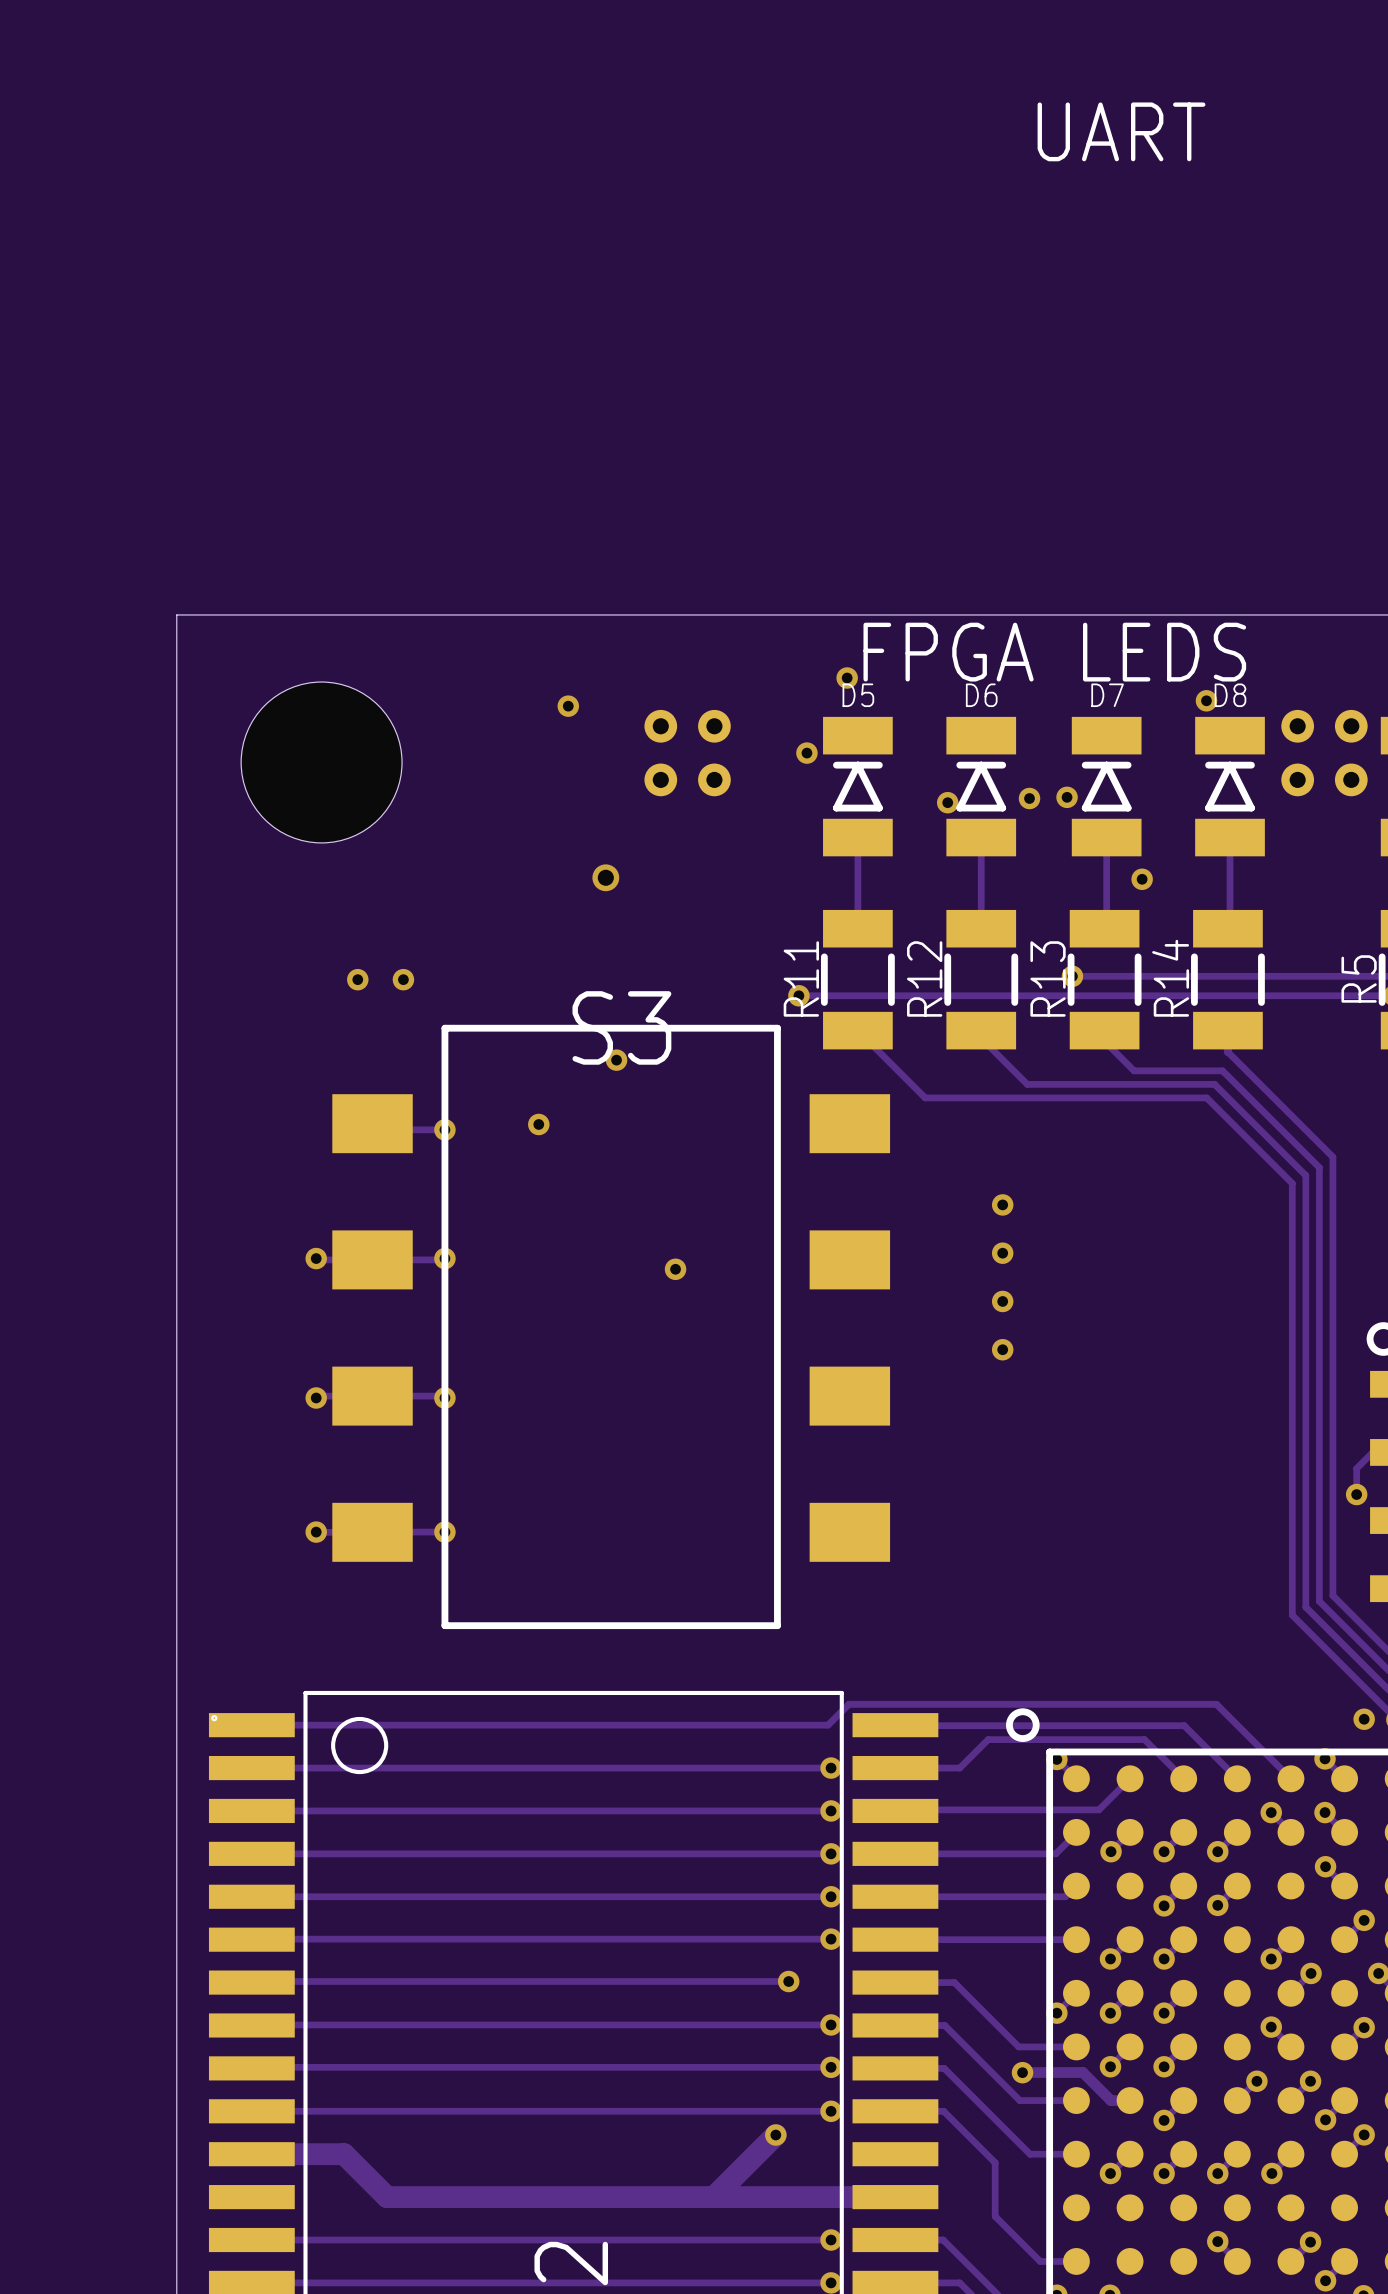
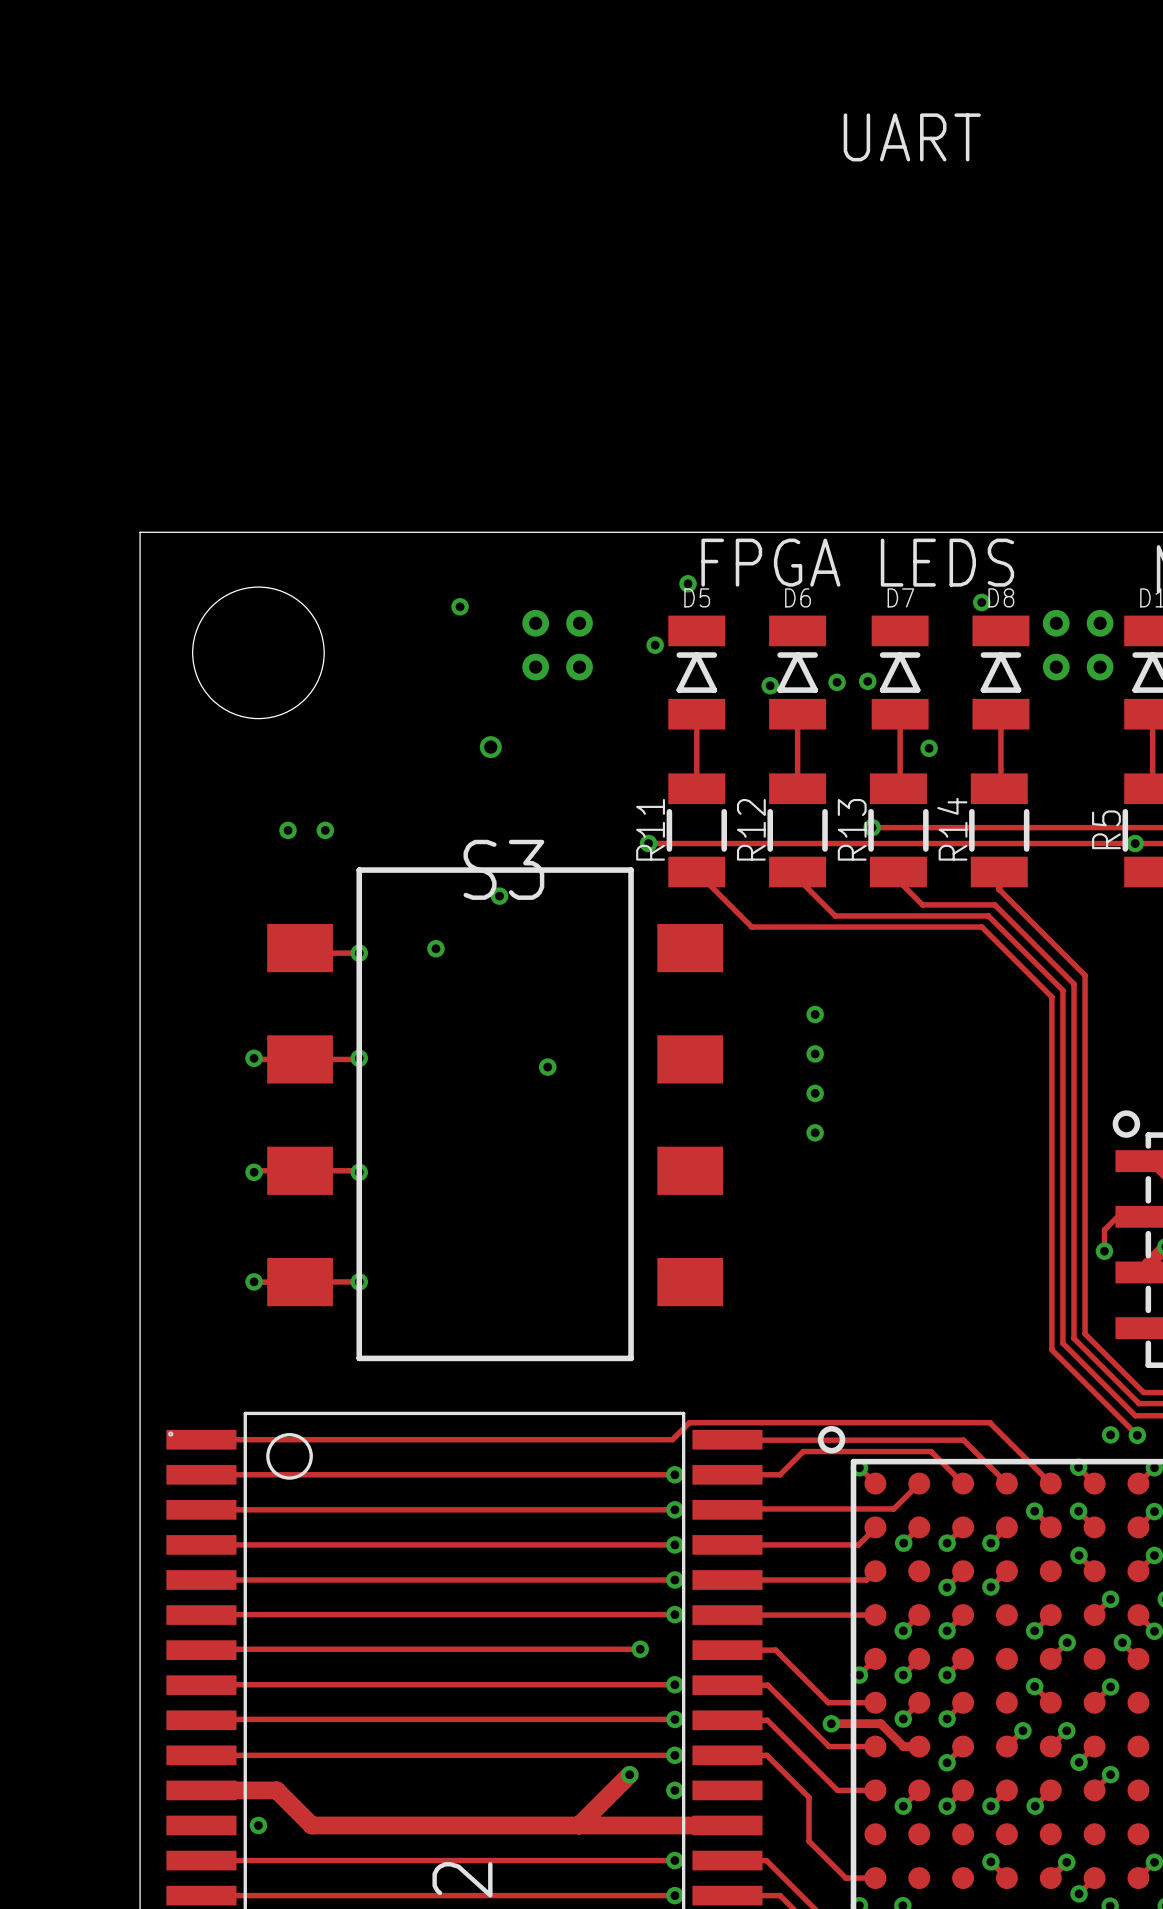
via: none -> (674, 1790)
via: none -> (258, 1825)

